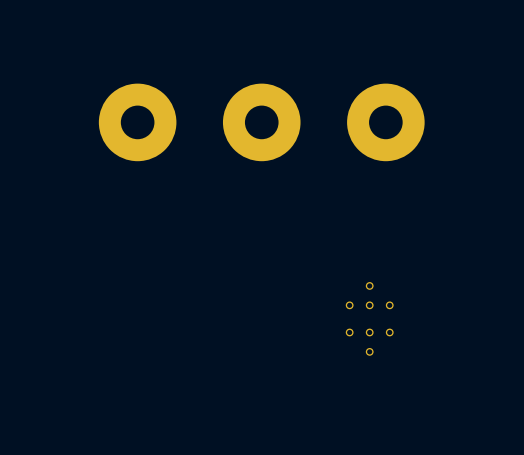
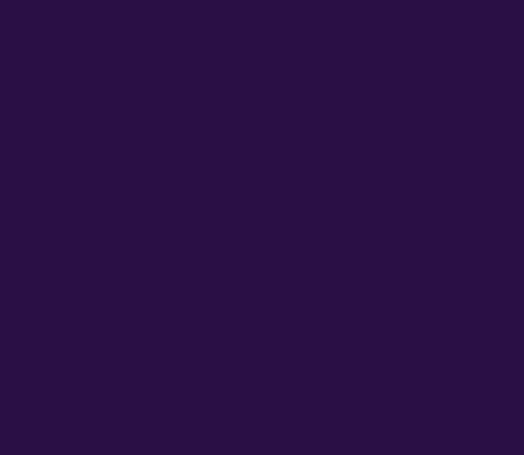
part: (261, 122) -> none
part: (369, 318) -> none

